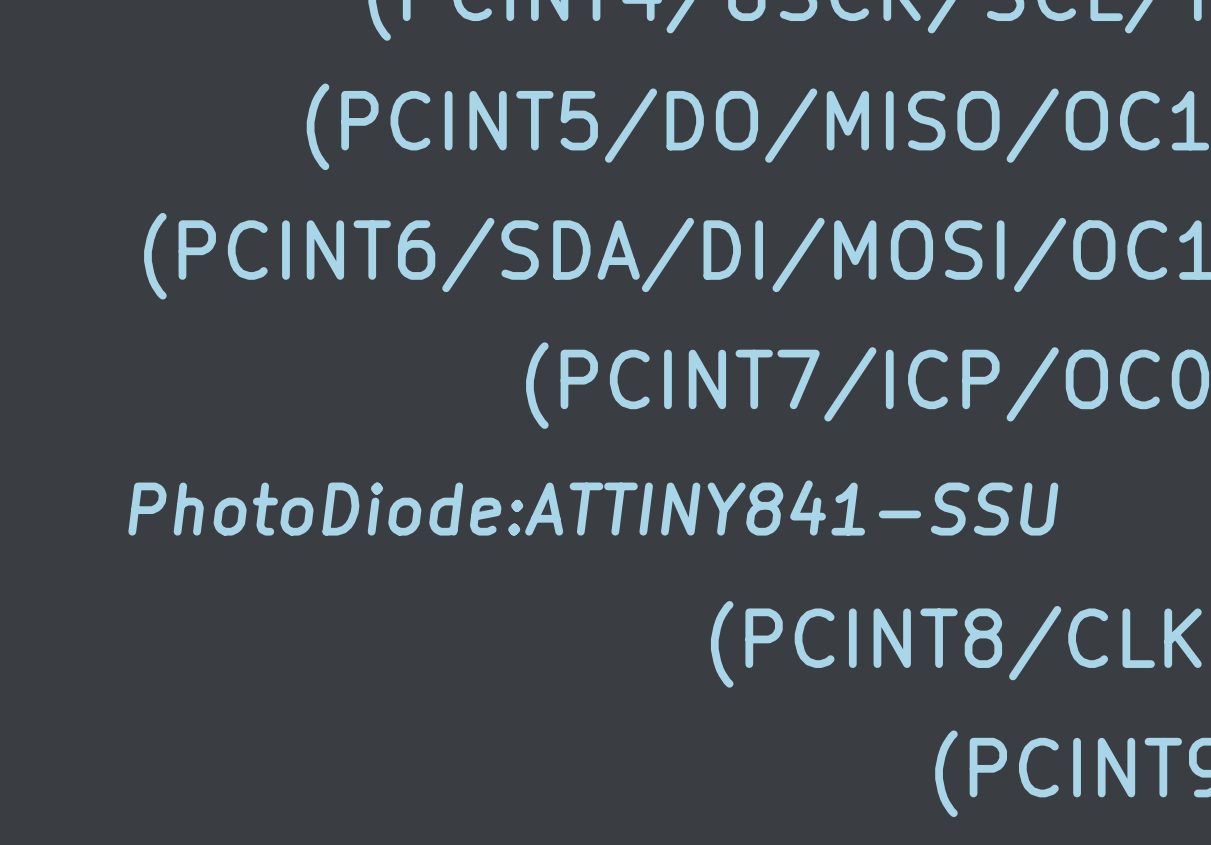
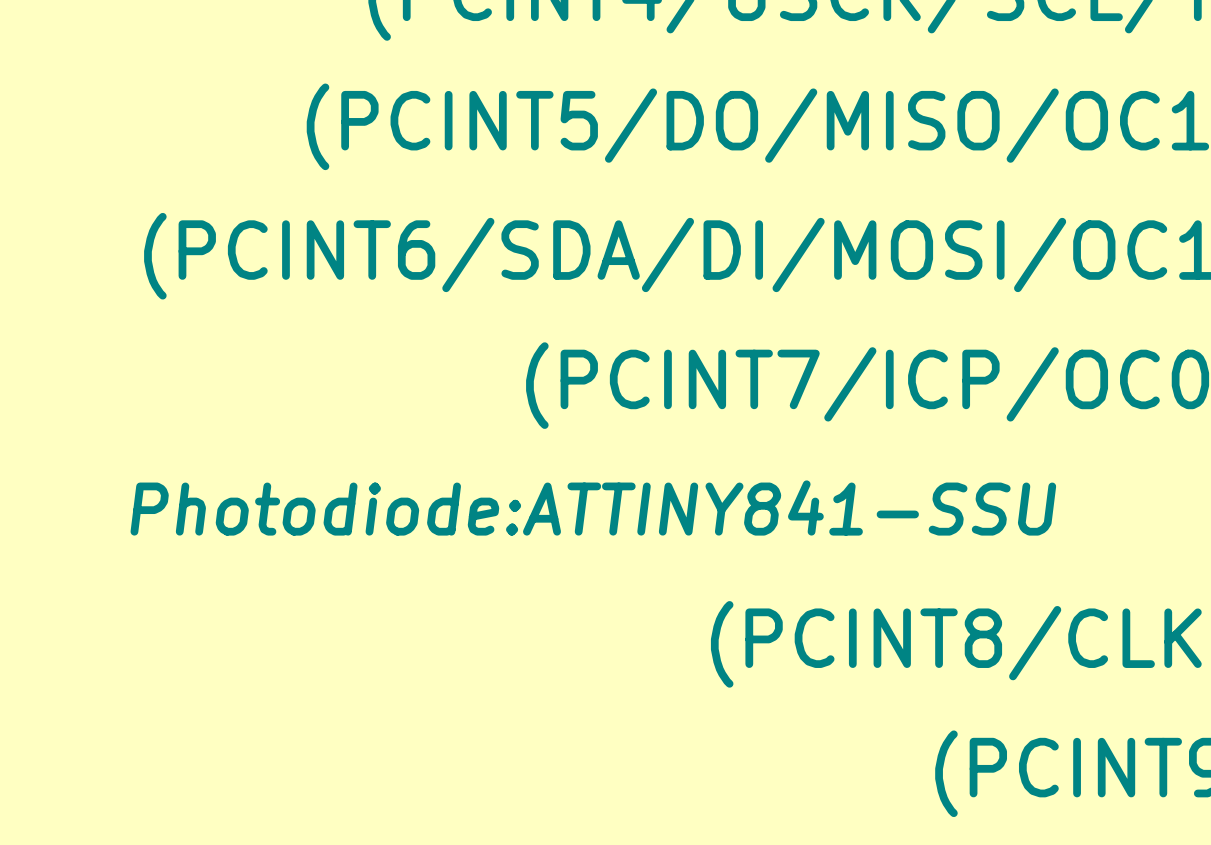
part text: PhotoDiode:ATTINY841-SSU (593, 507) -> Photodiode:ATTINY841-SSU (593, 507)

